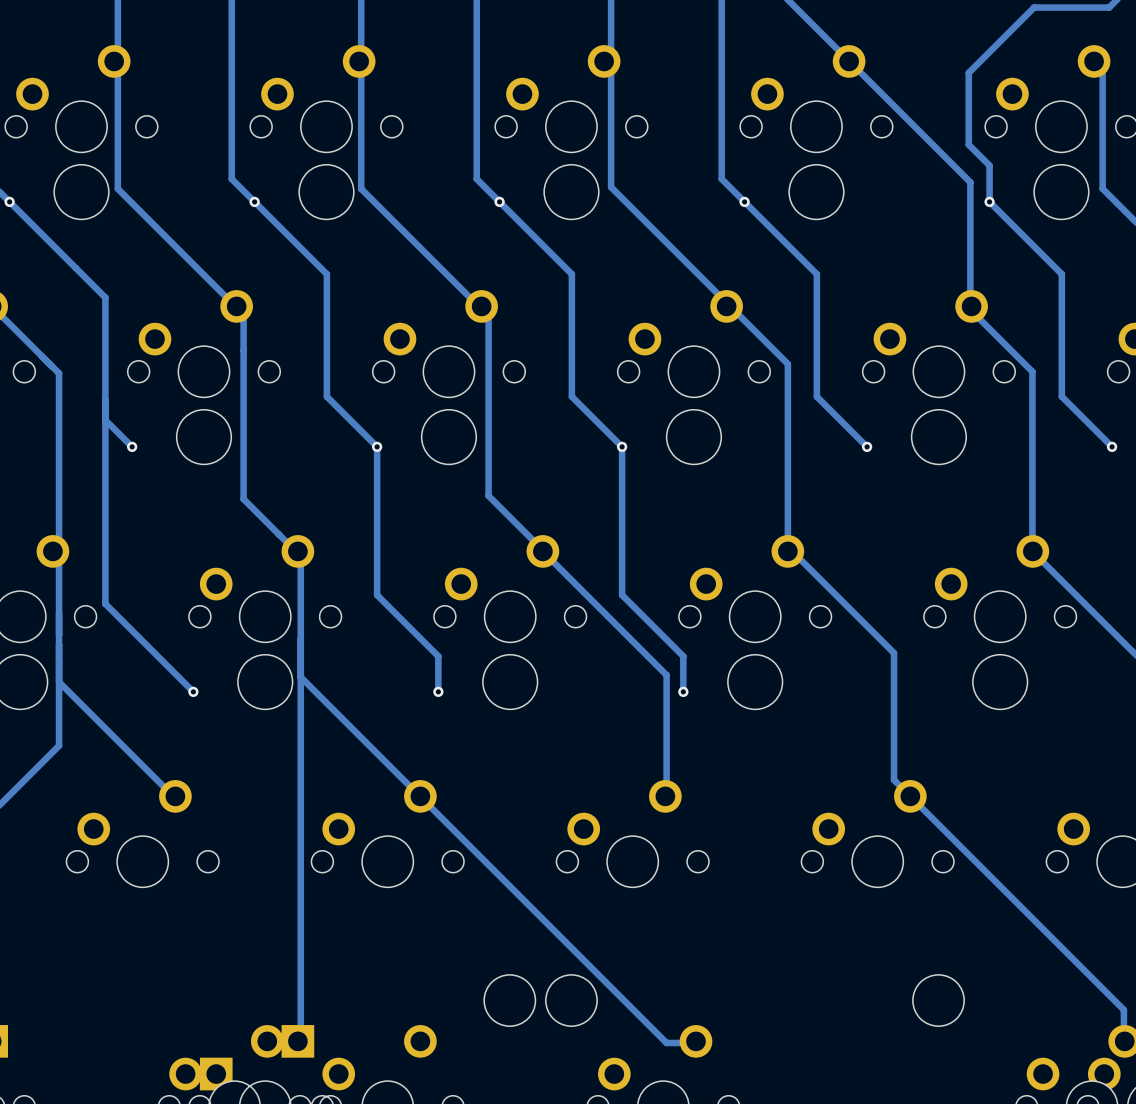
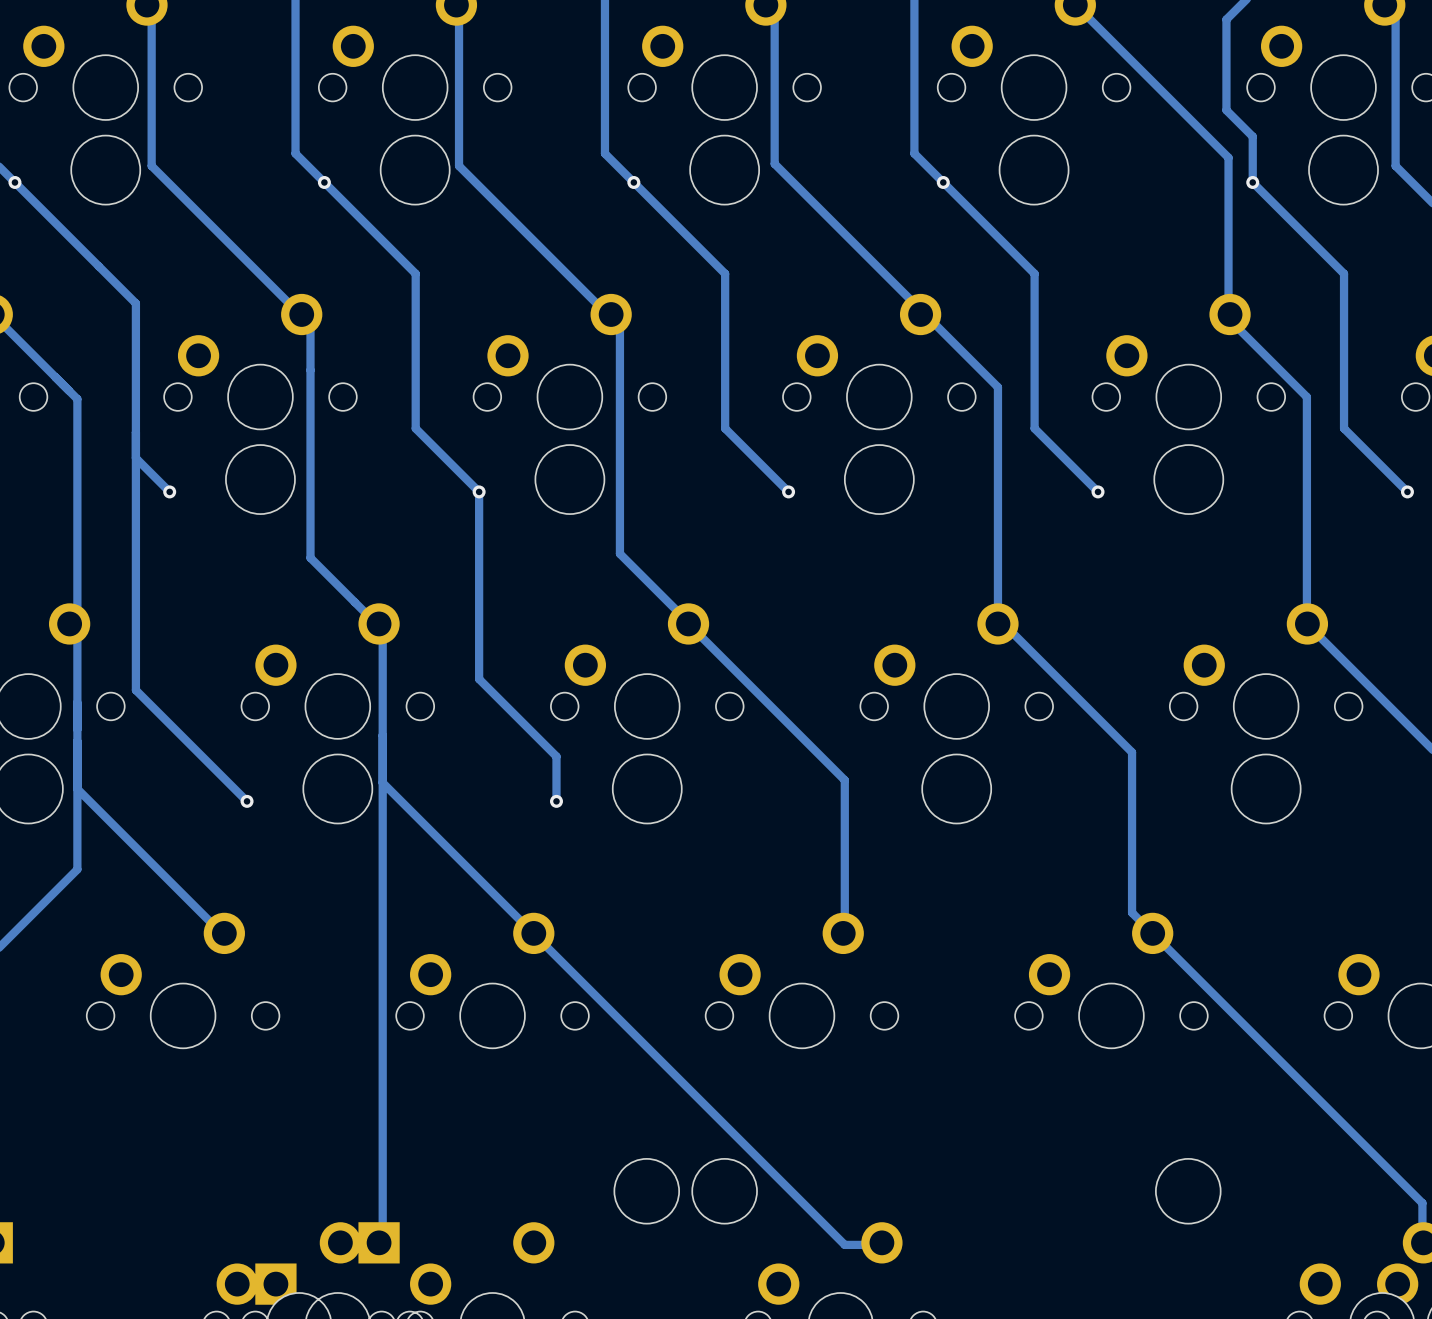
track: (622, 446) (622, 595) (683, 656) (683, 691) -> none
via: (683, 691) -> none

